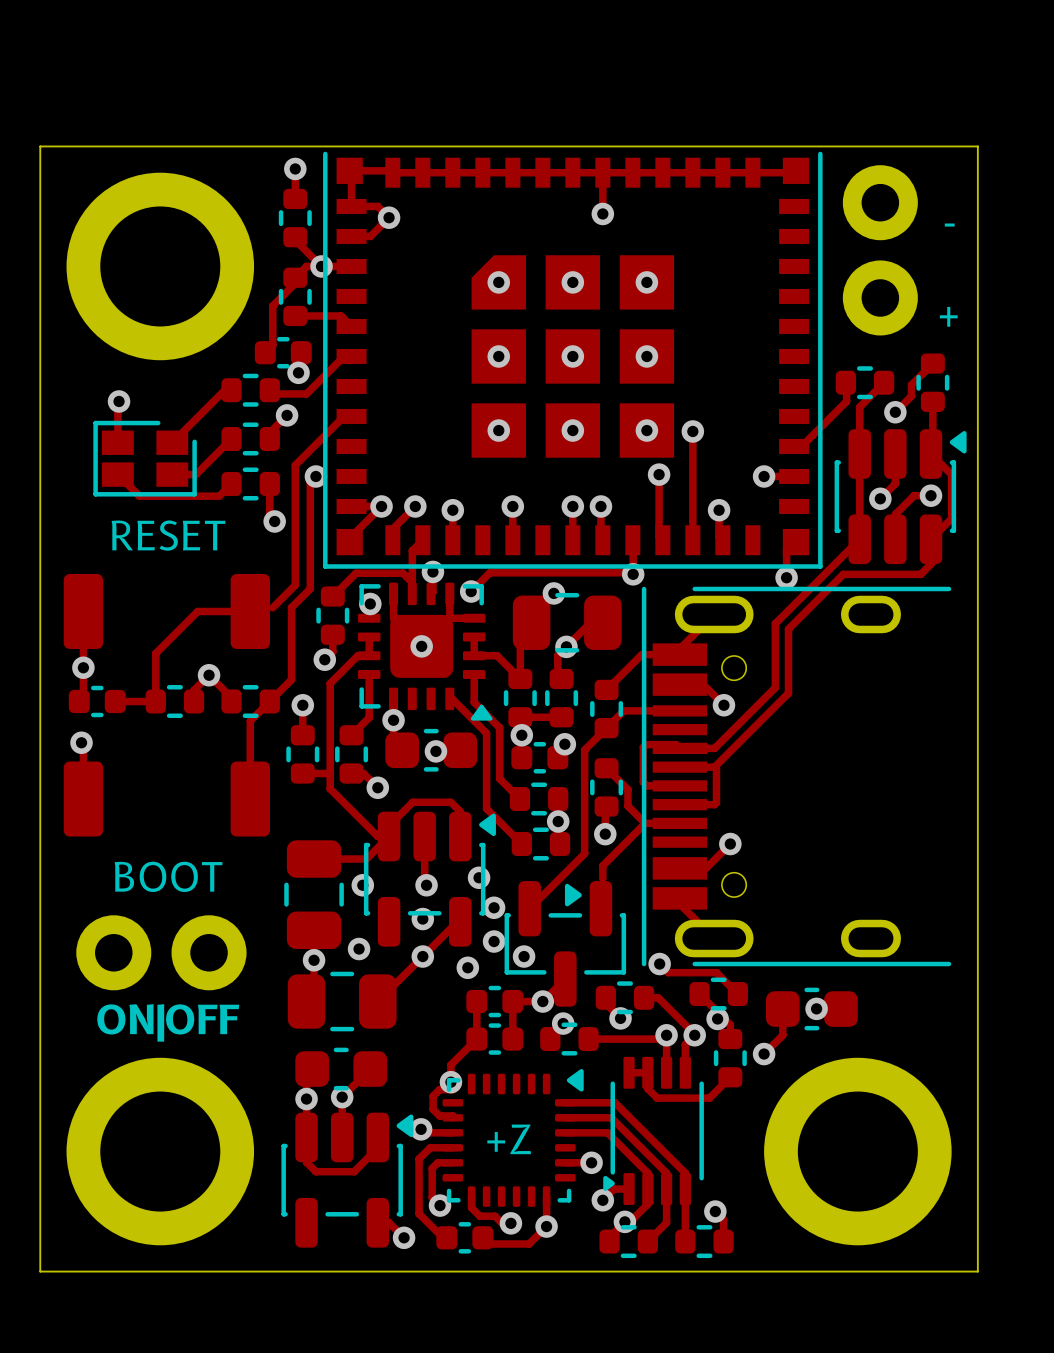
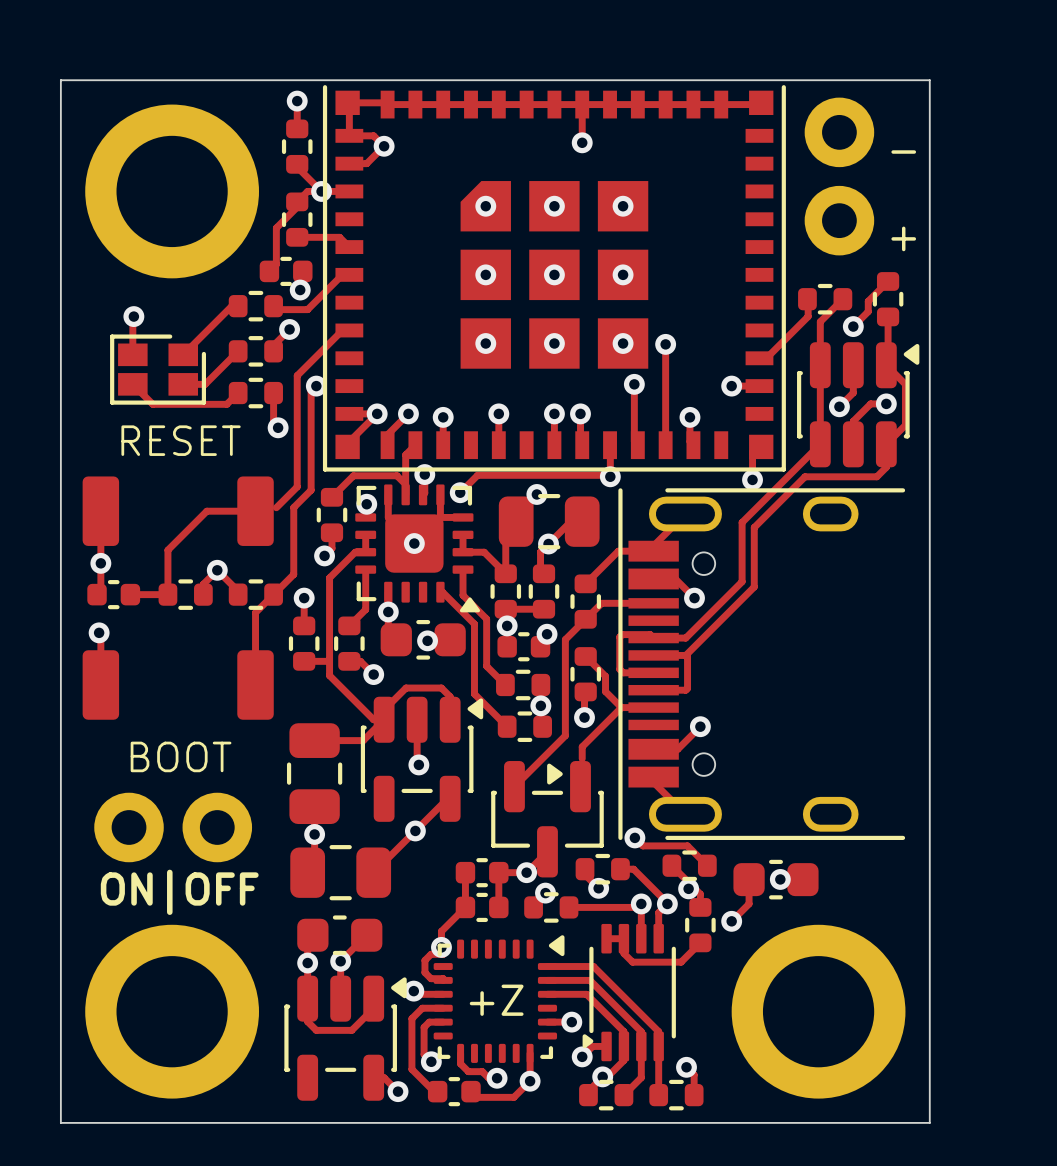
via: (479, 877) -> none
via: (362, 885) -> none
via: (494, 907) -> none
via: (422, 919) -> none
via: (494, 941) -> none
via: (359, 949) -> none
via: (524, 956) -> none
via: (467, 967) -> none

